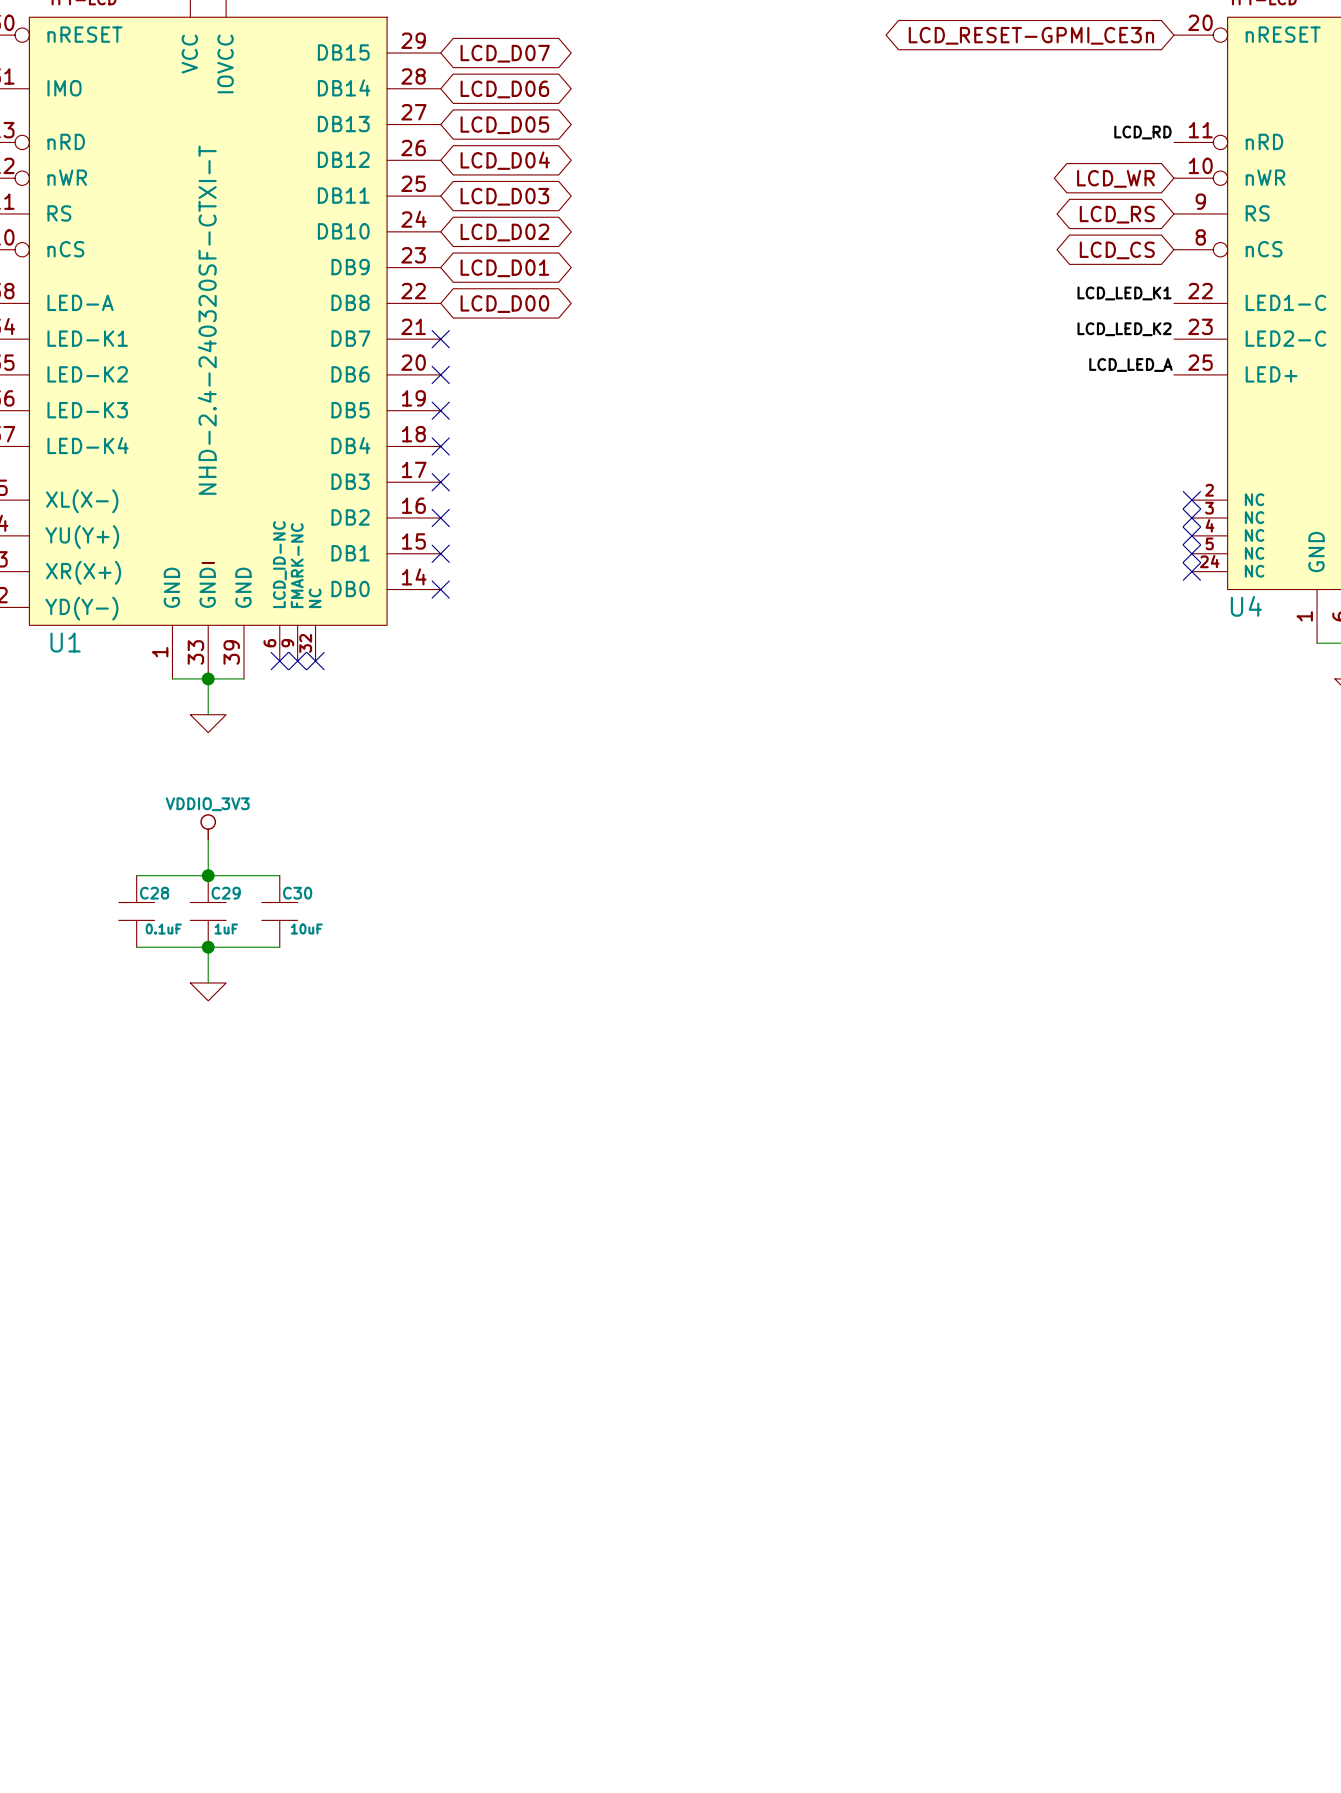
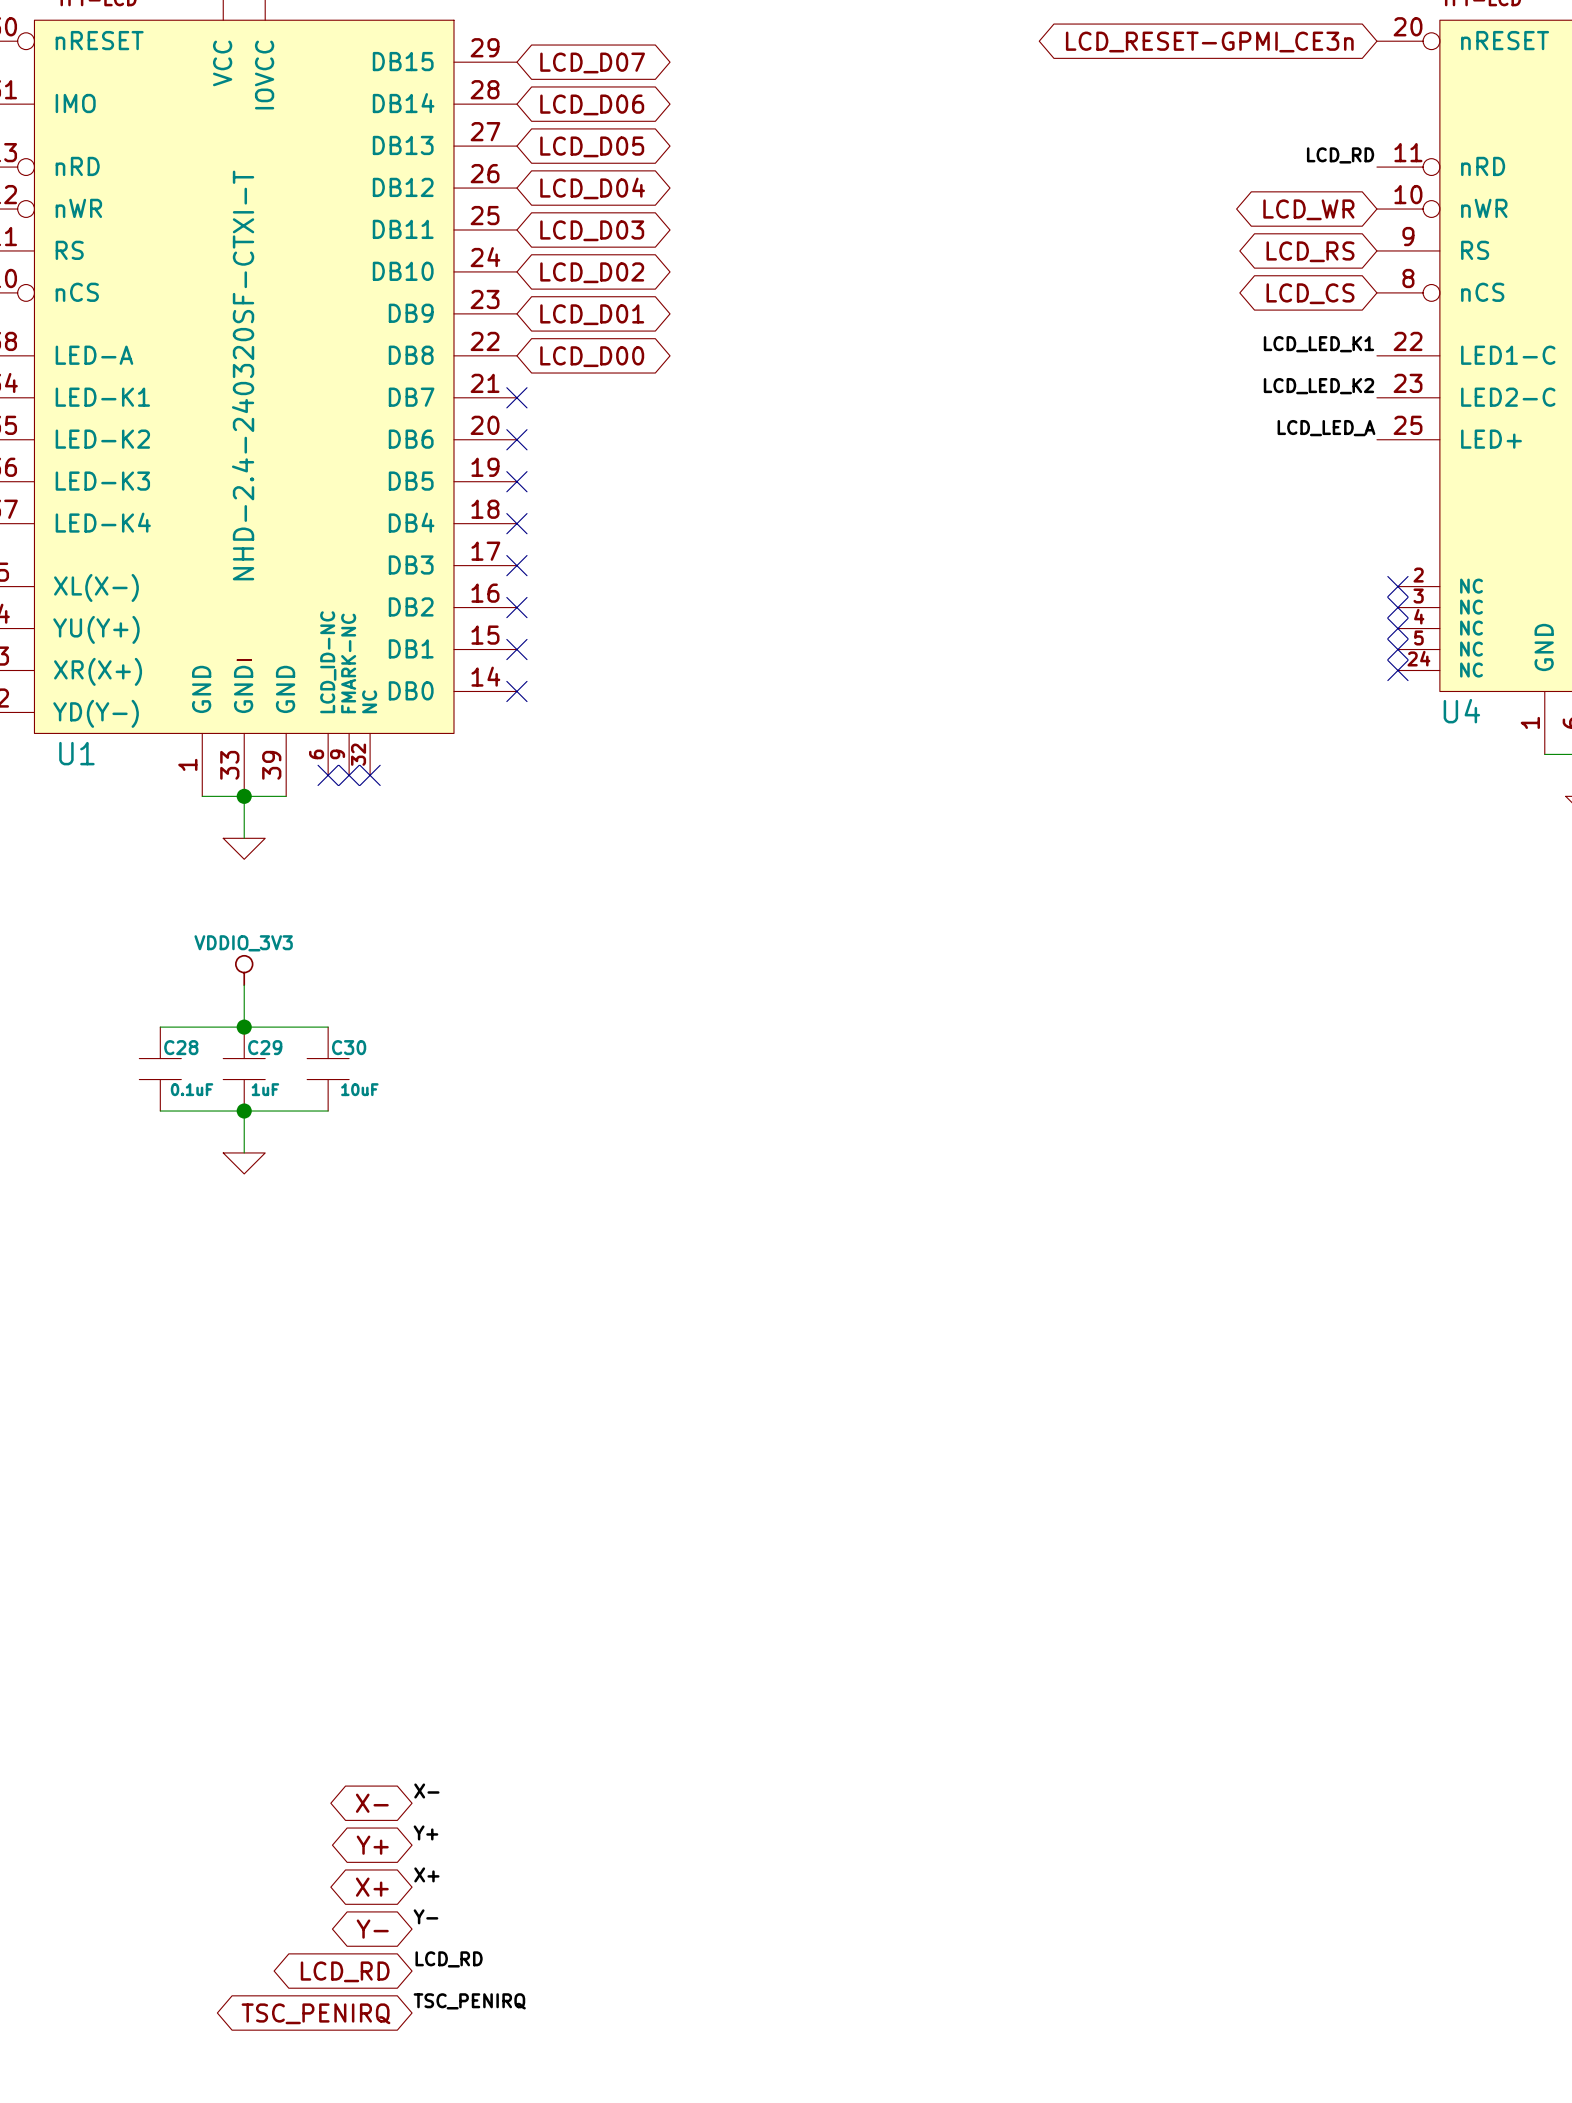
label: none -> X- (426, 1791)
global label: none -> X- (372, 1803)
label: none -> Y+ (425, 1832)
global label: none -> Y+ (372, 1845)
label: none -> X+ (426, 1874)
global label: none -> X+ (372, 1887)
label: none -> Y- (425, 1916)
global label: none -> Y- (372, 1929)
label: none -> LCD_RD (449, 1959)
global label: none -> LCD_RD (345, 1971)
label: none -> TSC_PENIRQ (469, 2001)
global label: none -> TSC_PENIRQ (315, 2013)

